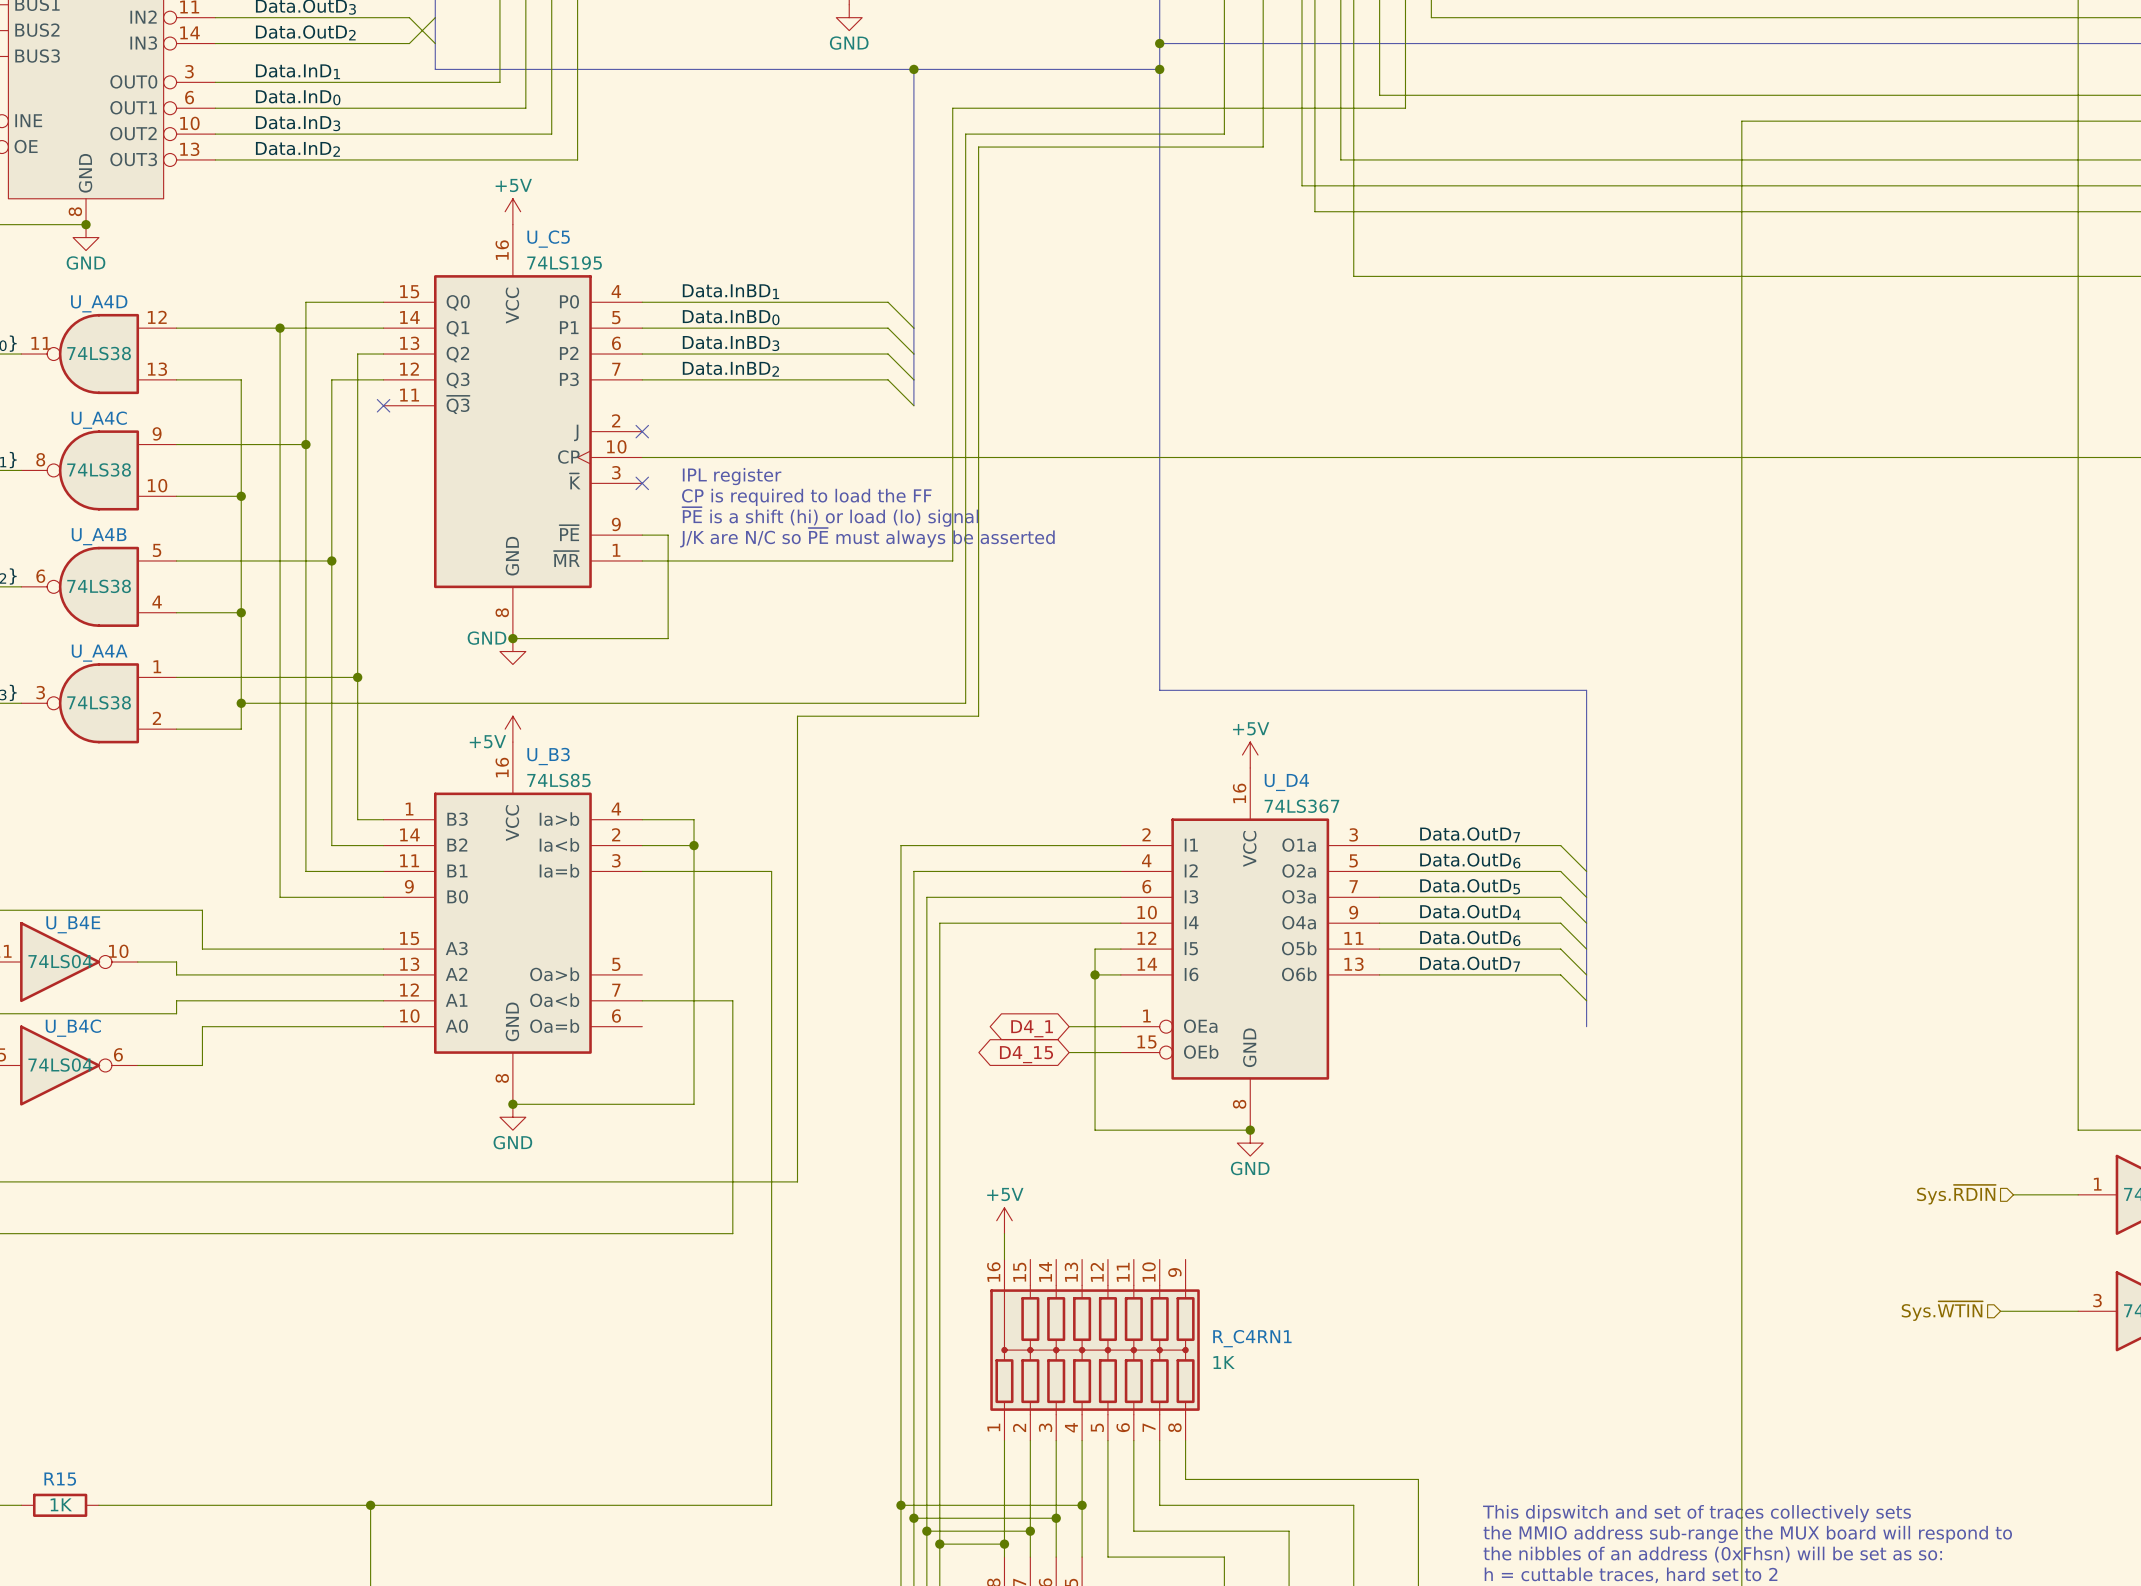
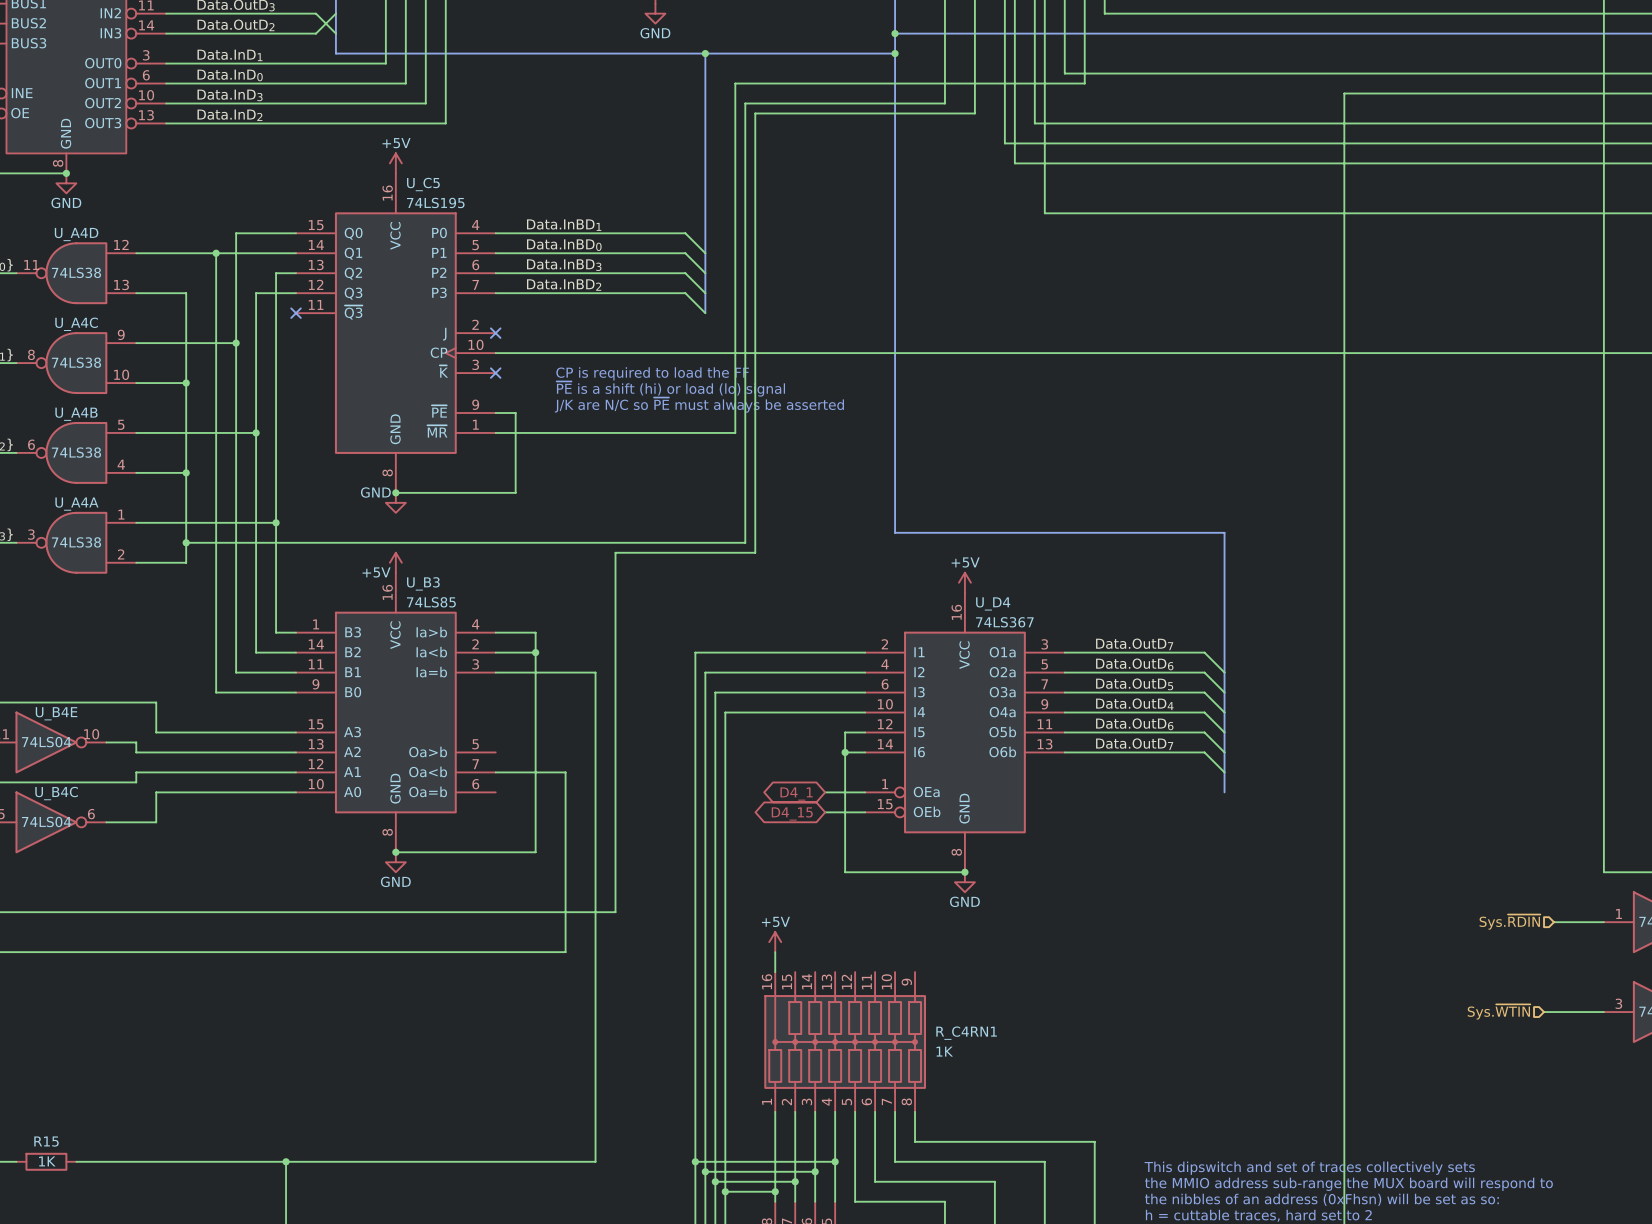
text: IPL register (732, 476) -> none
text position: CP is required to load the FF (806, 497) -> CP is required to load the FF (652, 373)
text position: ~{PE} is a shift (hi) or load (lo) signal (830, 516) -> ~{PE} is a shift (hi) or load (lo) signal (670, 389)
text position: J/K are N/C so ~{PE} must always be asserted (867, 537) -> J/K are N/C so ~{PE} must always be asserted (699, 405)

